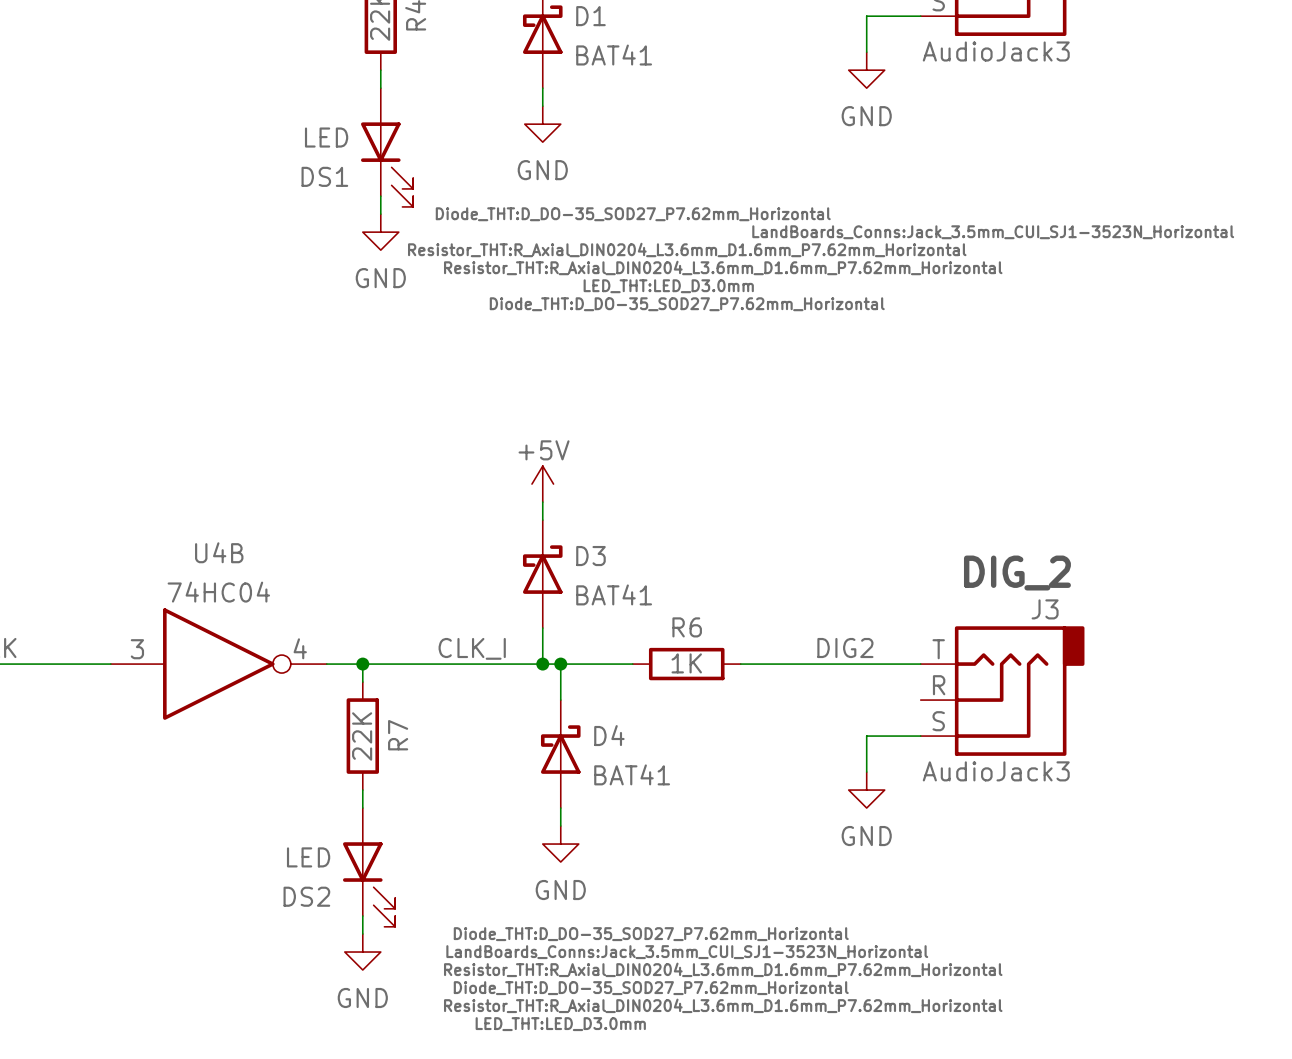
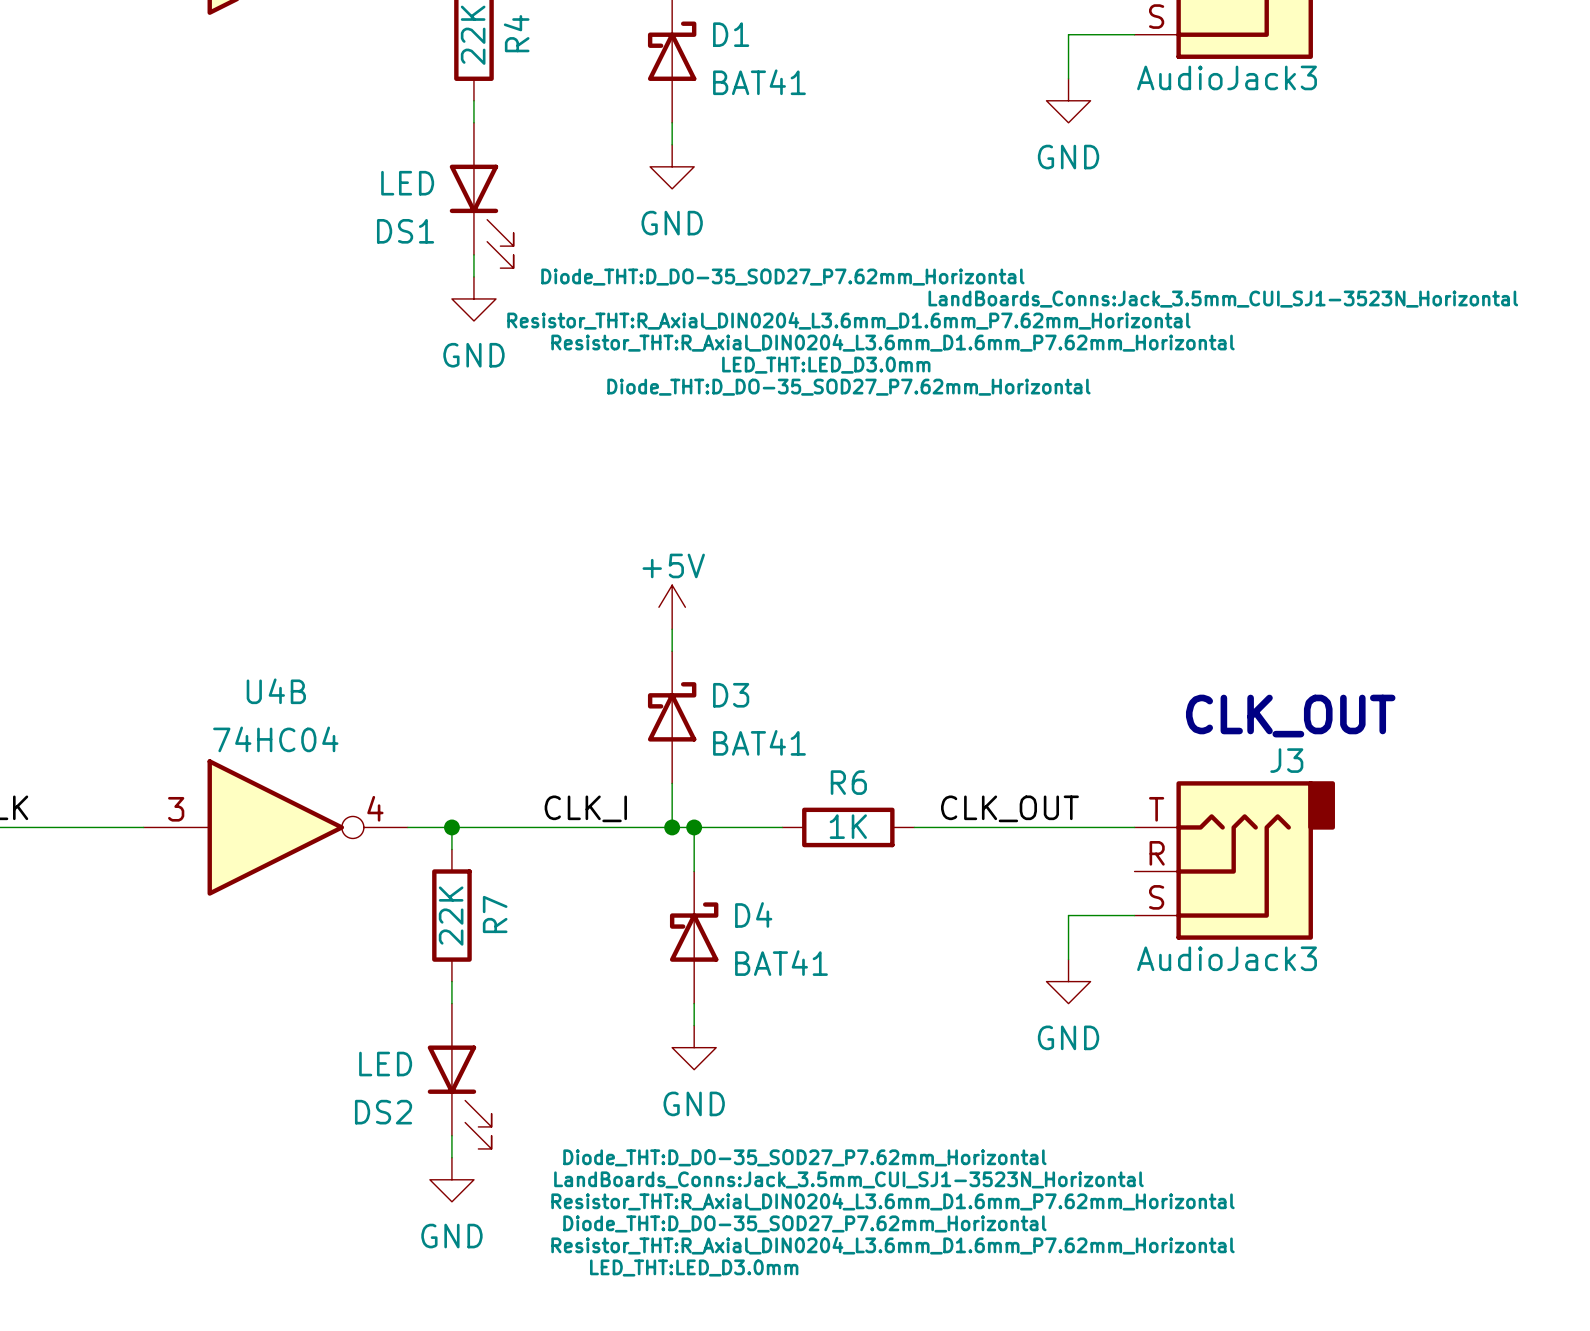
text: DIG_2 (1017, 573) -> CLK_OUT (1290, 716)
label: none -> CLK_OUT (1009, 808)
label: DIG2 (845, 648) -> none

